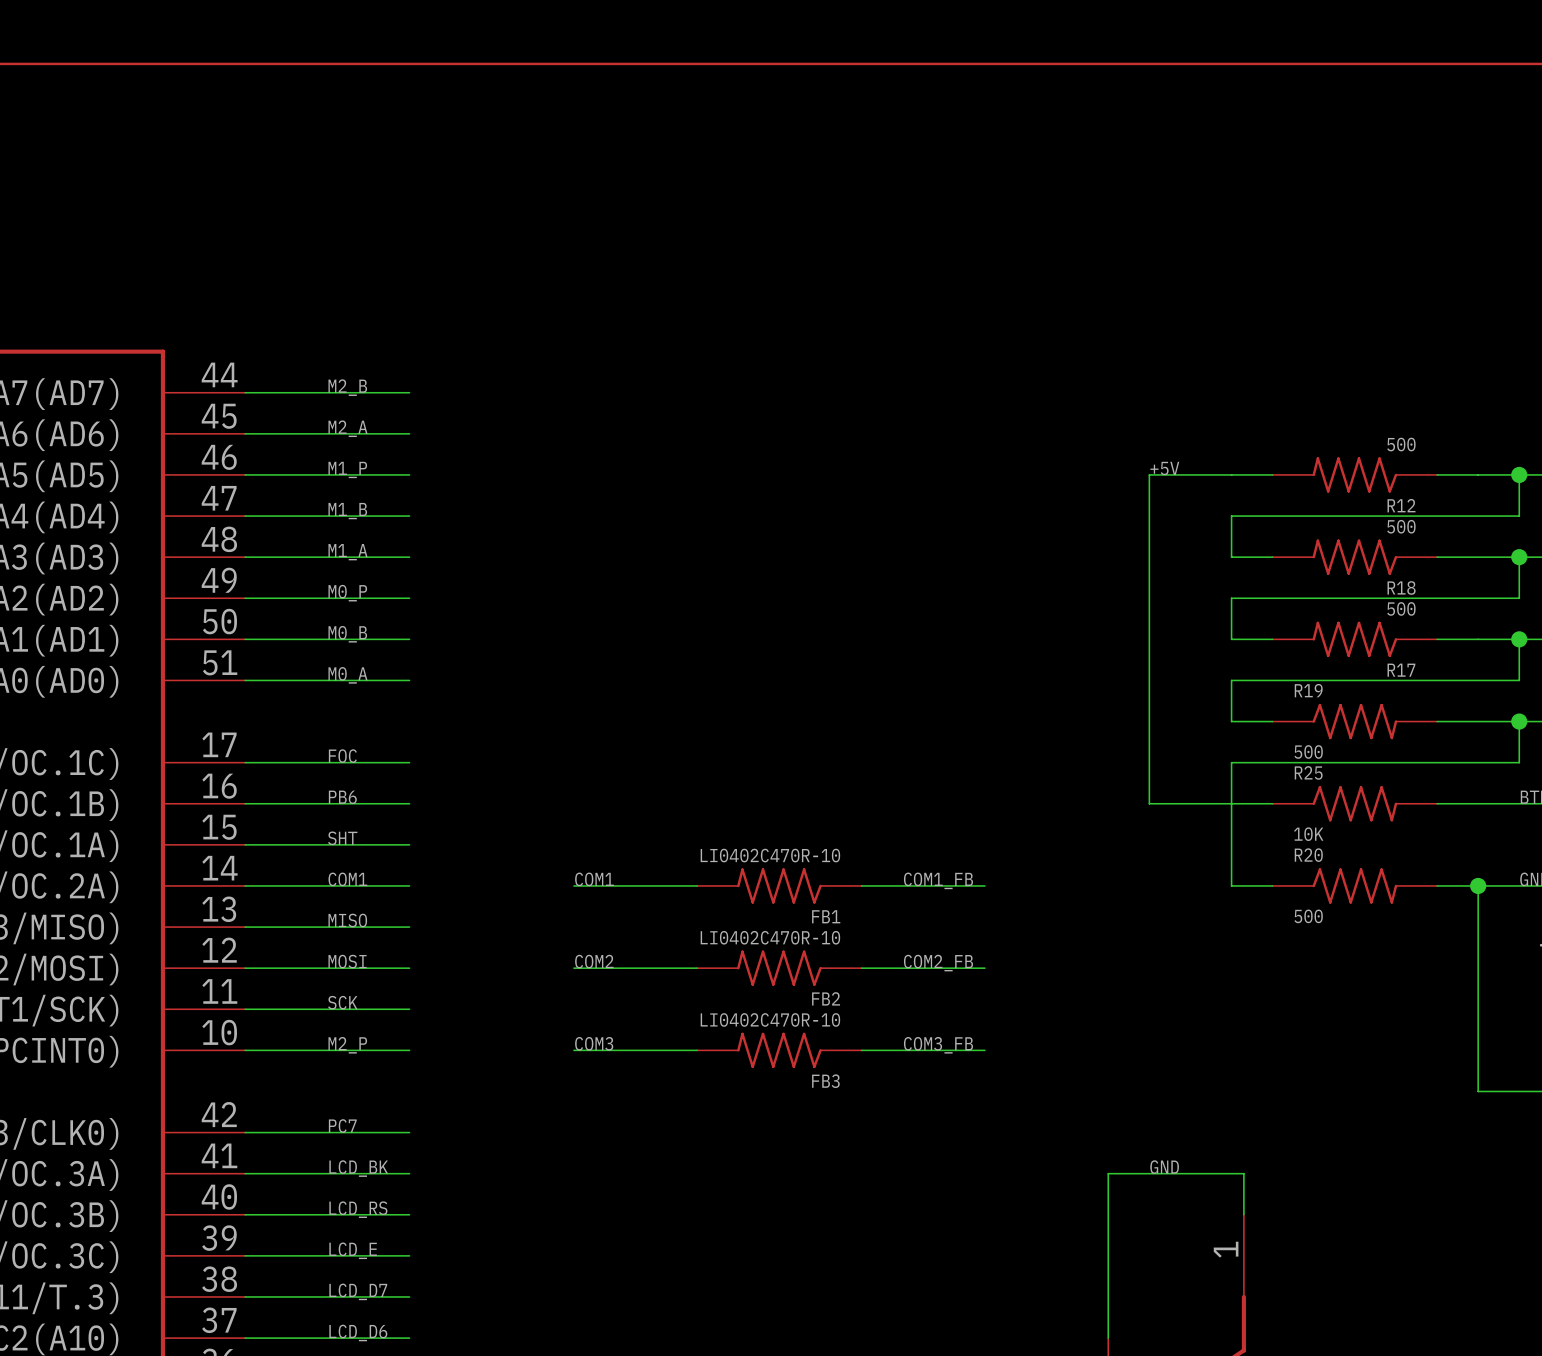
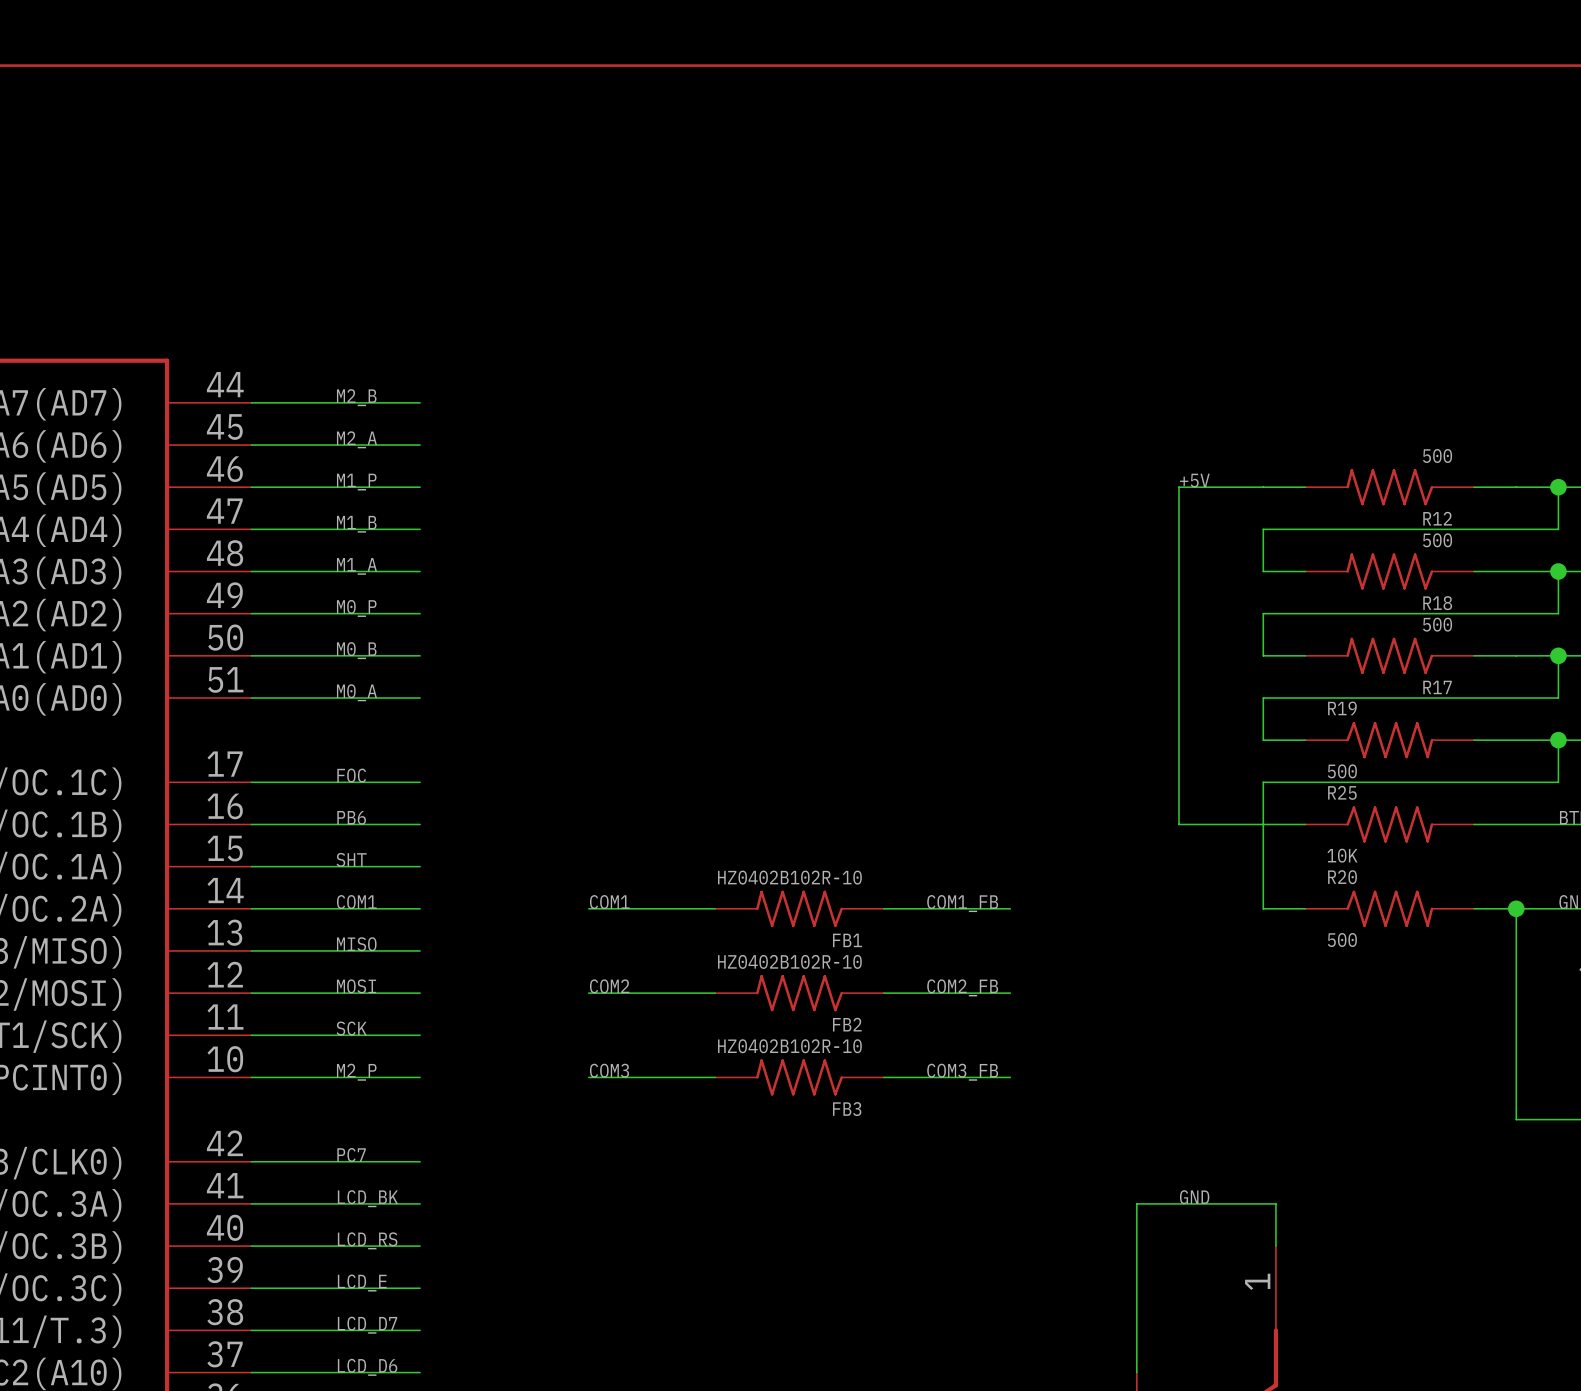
FB1 value: LI0402C470R-10 (770, 855) -> HZ0402B102R-10 (789, 877)
FB2 value: LI0402C470R-10 (770, 937) -> HZ0402B102R-10 (789, 961)
FB3 value: LI0402C470R-10 (770, 1019) -> HZ0402B102R-10 (789, 1046)

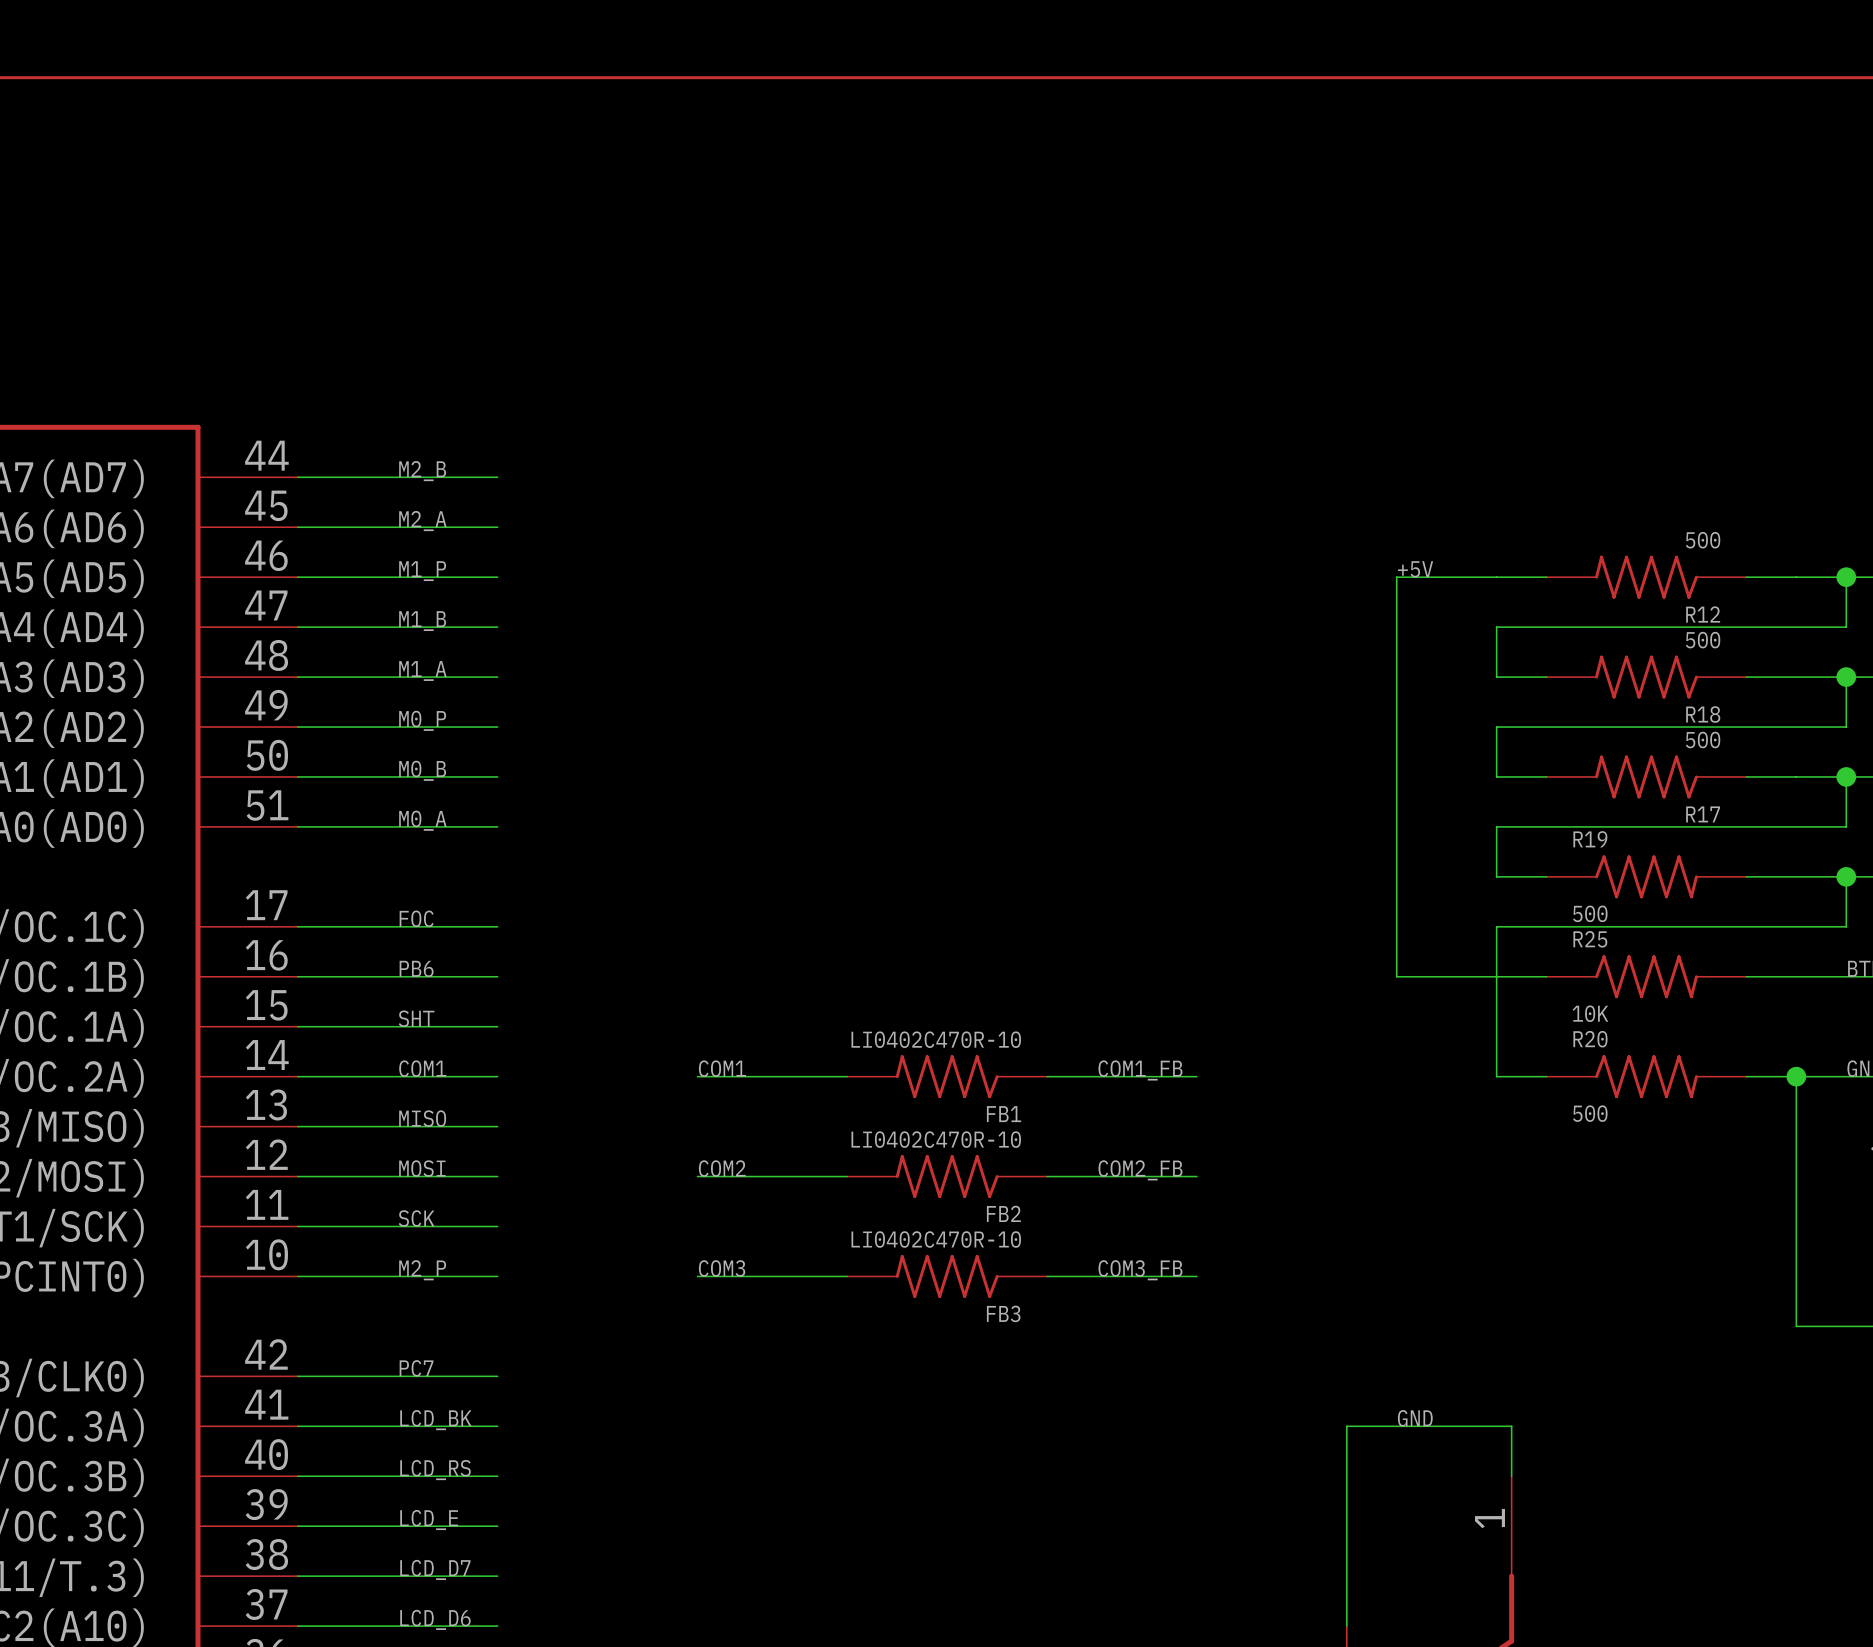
FB1 value: HZ0402B102R-10 (789, 877) -> LI0402C470R-10 (936, 1039)
FB2 value: HZ0402B102R-10 (789, 961) -> LI0402C470R-10 (936, 1139)
FB3 value: HZ0402B102R-10 (789, 1046) -> LI0402C470R-10 (936, 1239)

